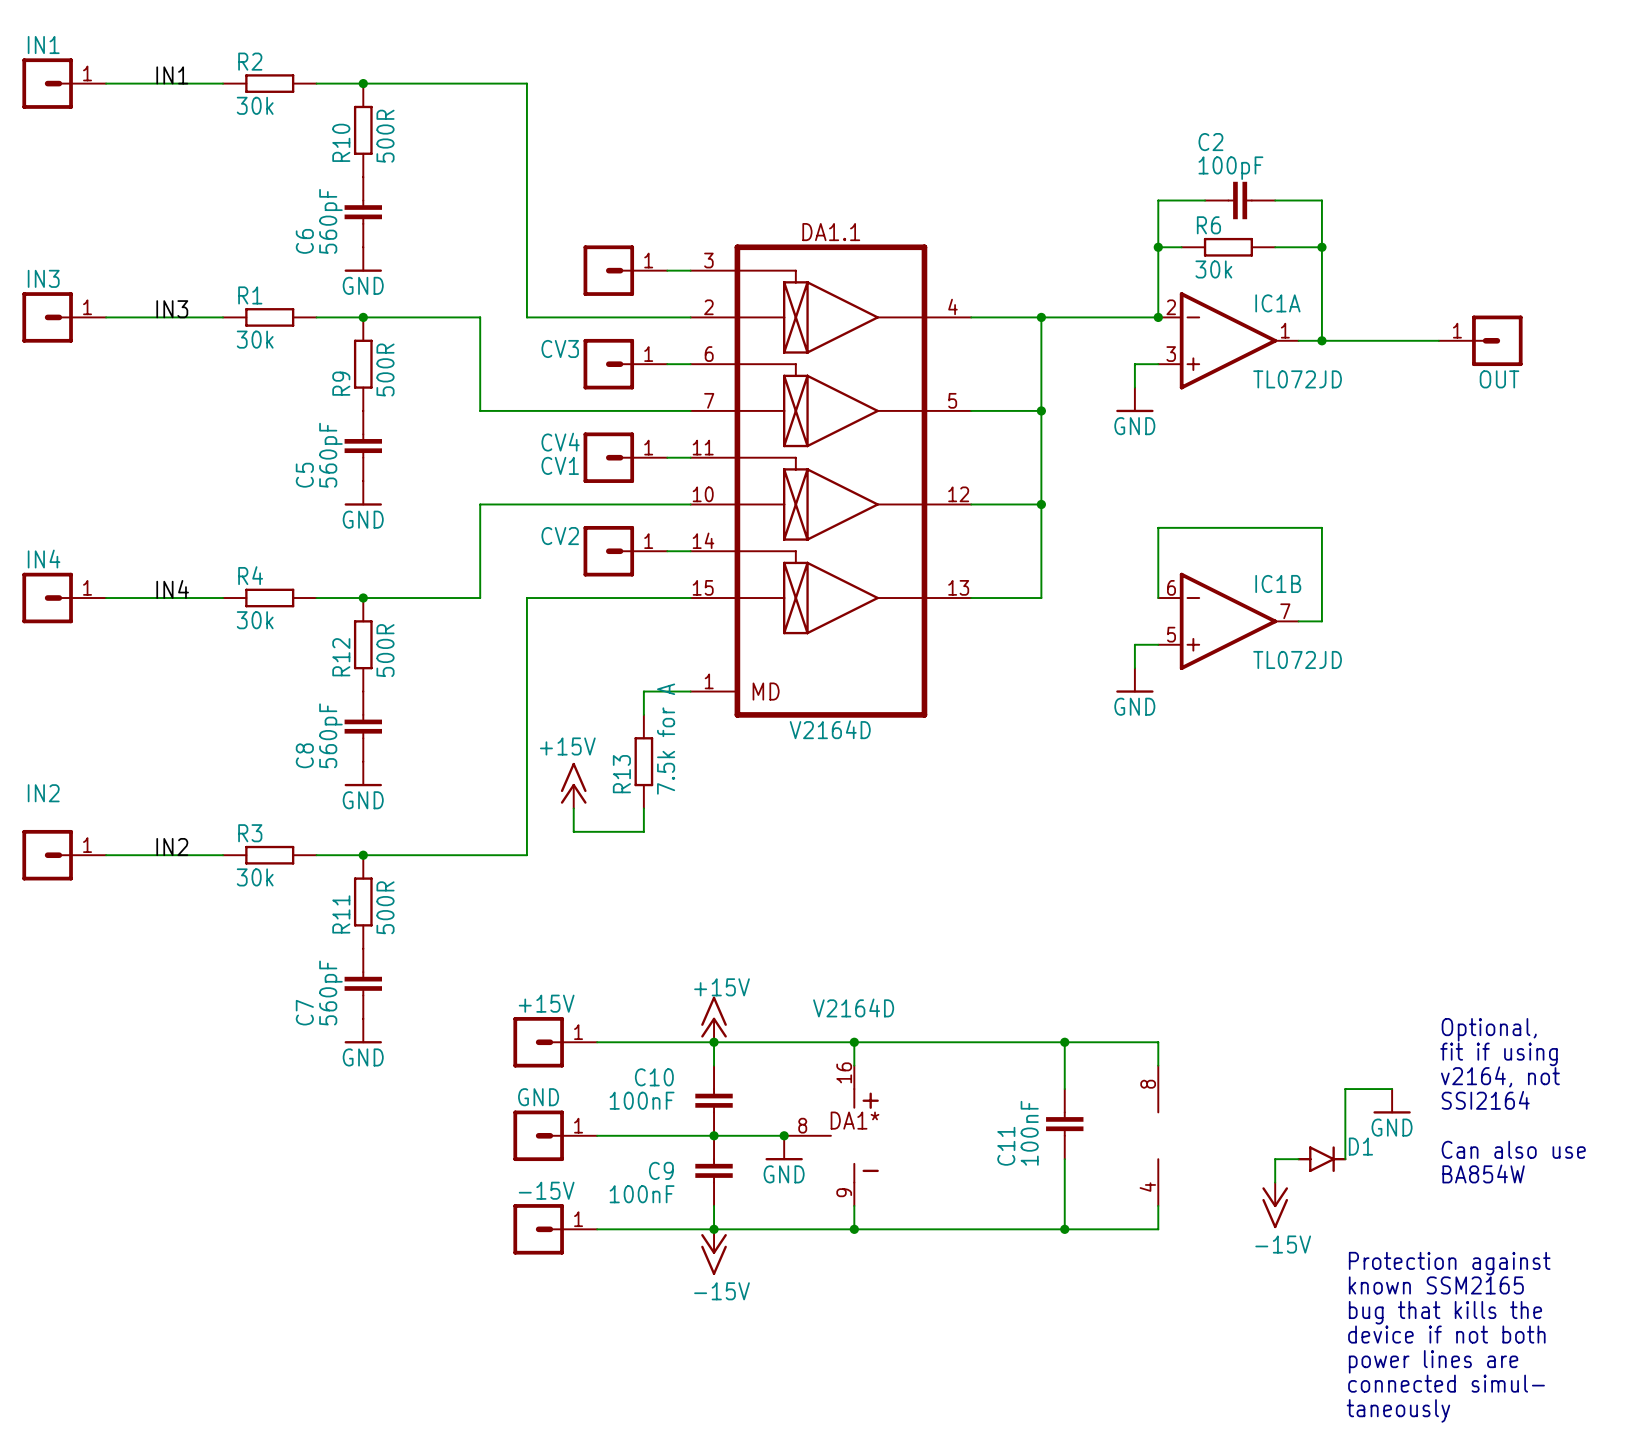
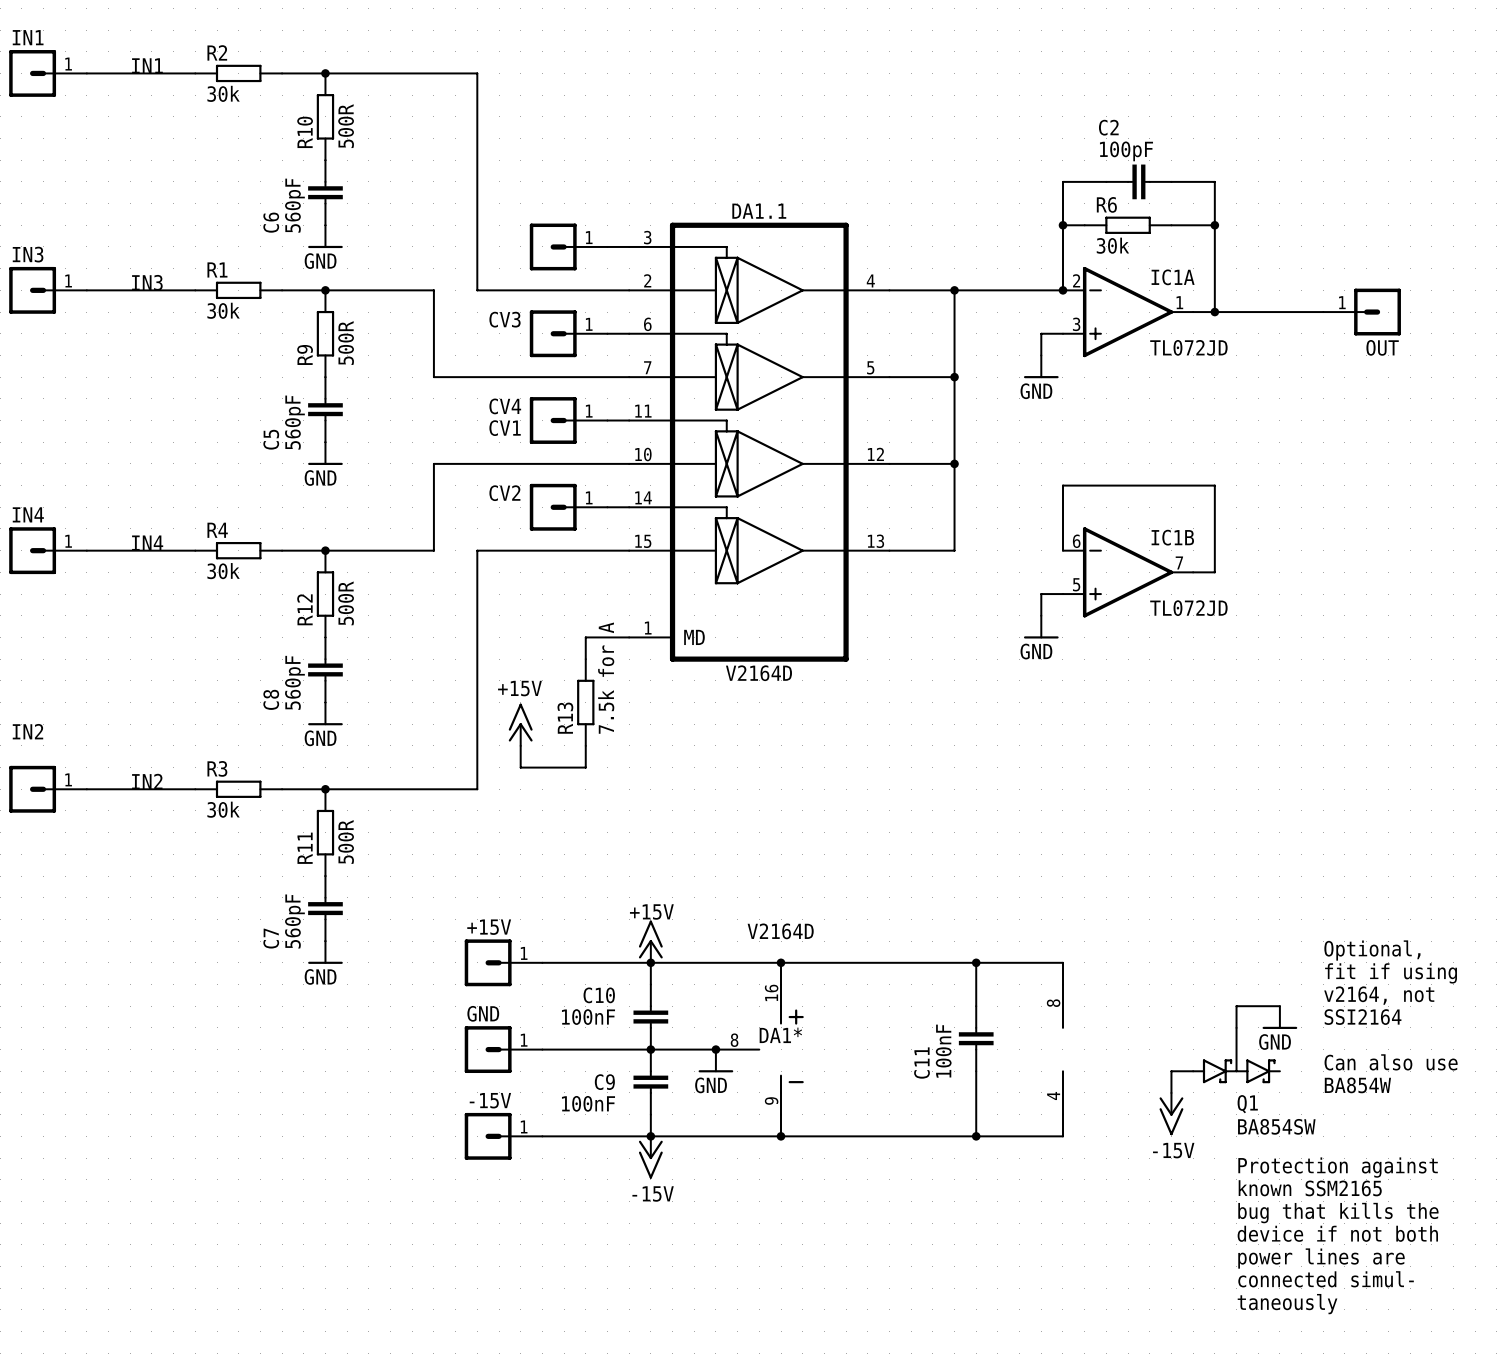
Q1: none -> BA854SW (1236, 1055)
D1: (1321, 1159) -> none

